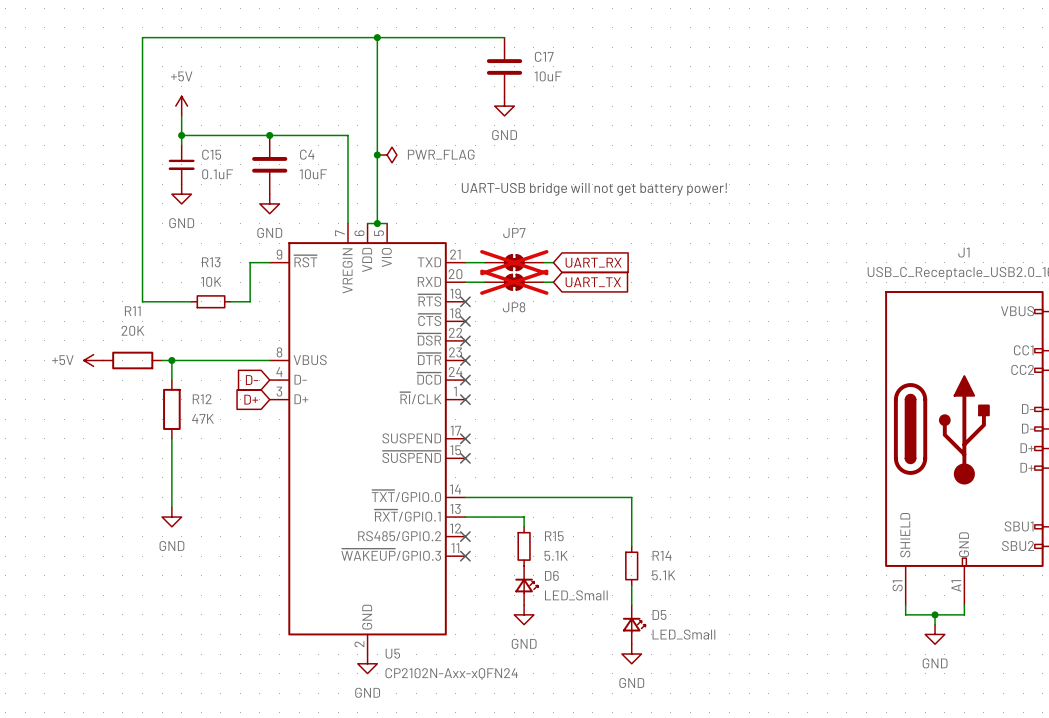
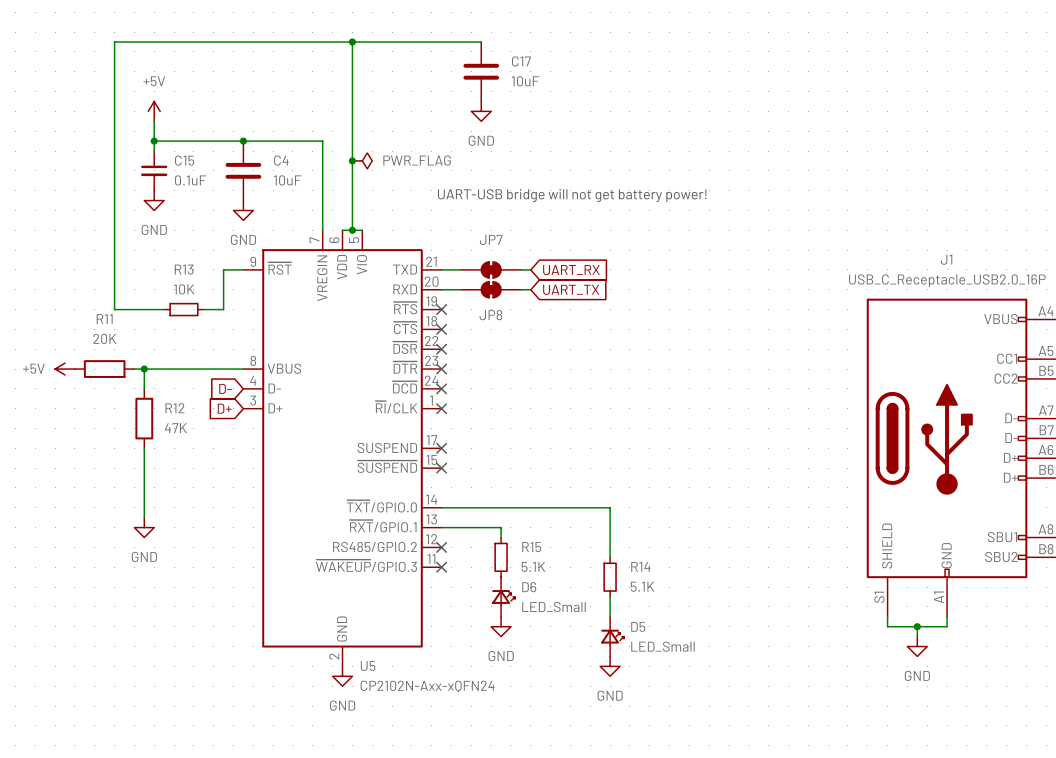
JP7 do-not-place cross: (514, 262) -> none
JP8 do-not-place cross: (514, 282) -> none

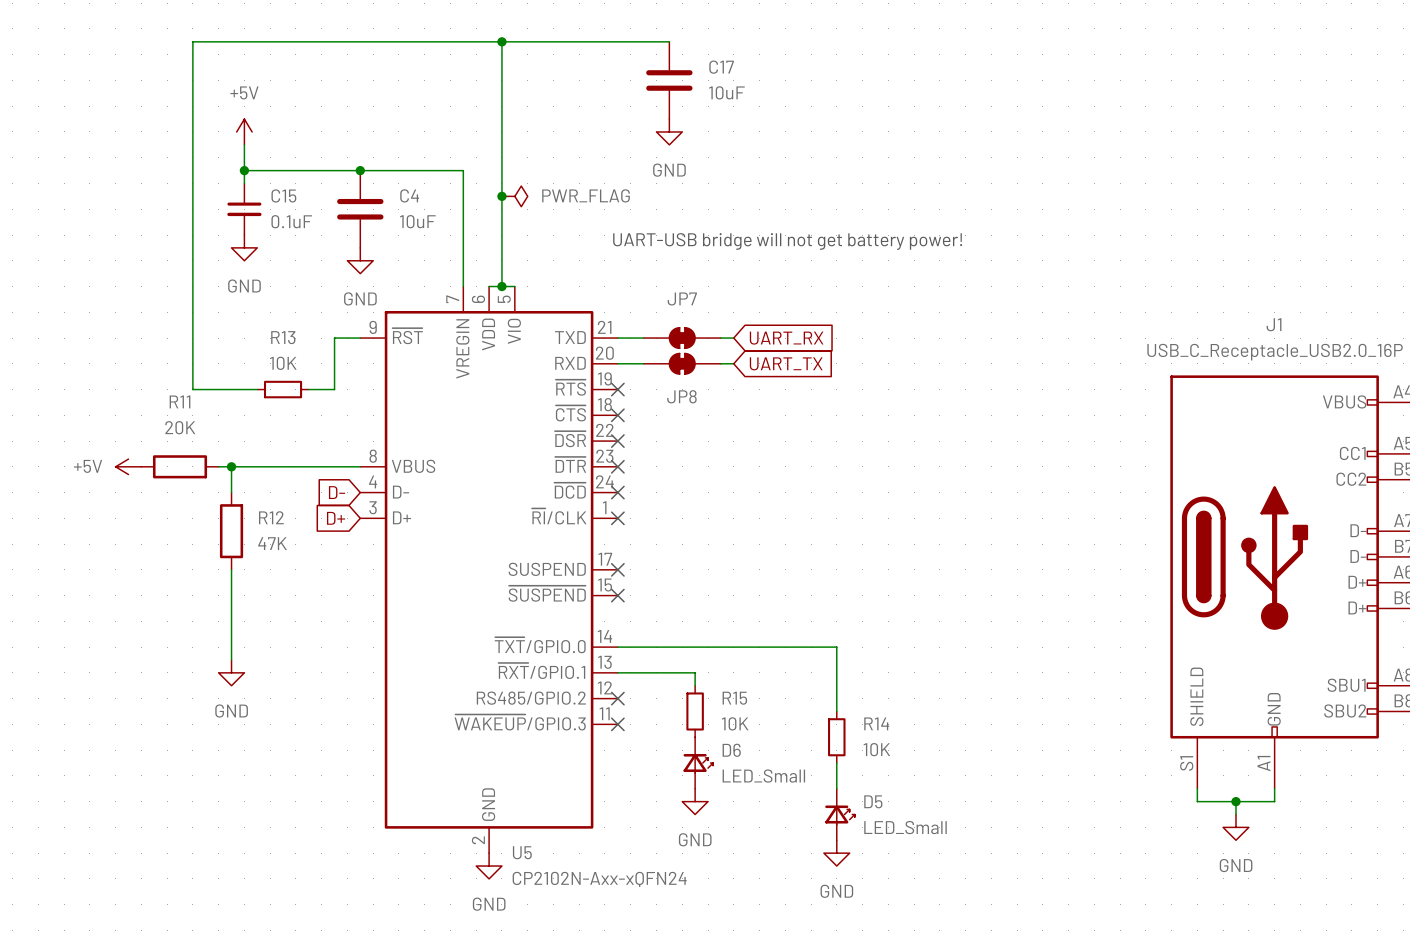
R15 value: 5.1K (533, 566) -> 10K (735, 723)
R14 value: 5.1K (642, 586) -> 10K (876, 749)

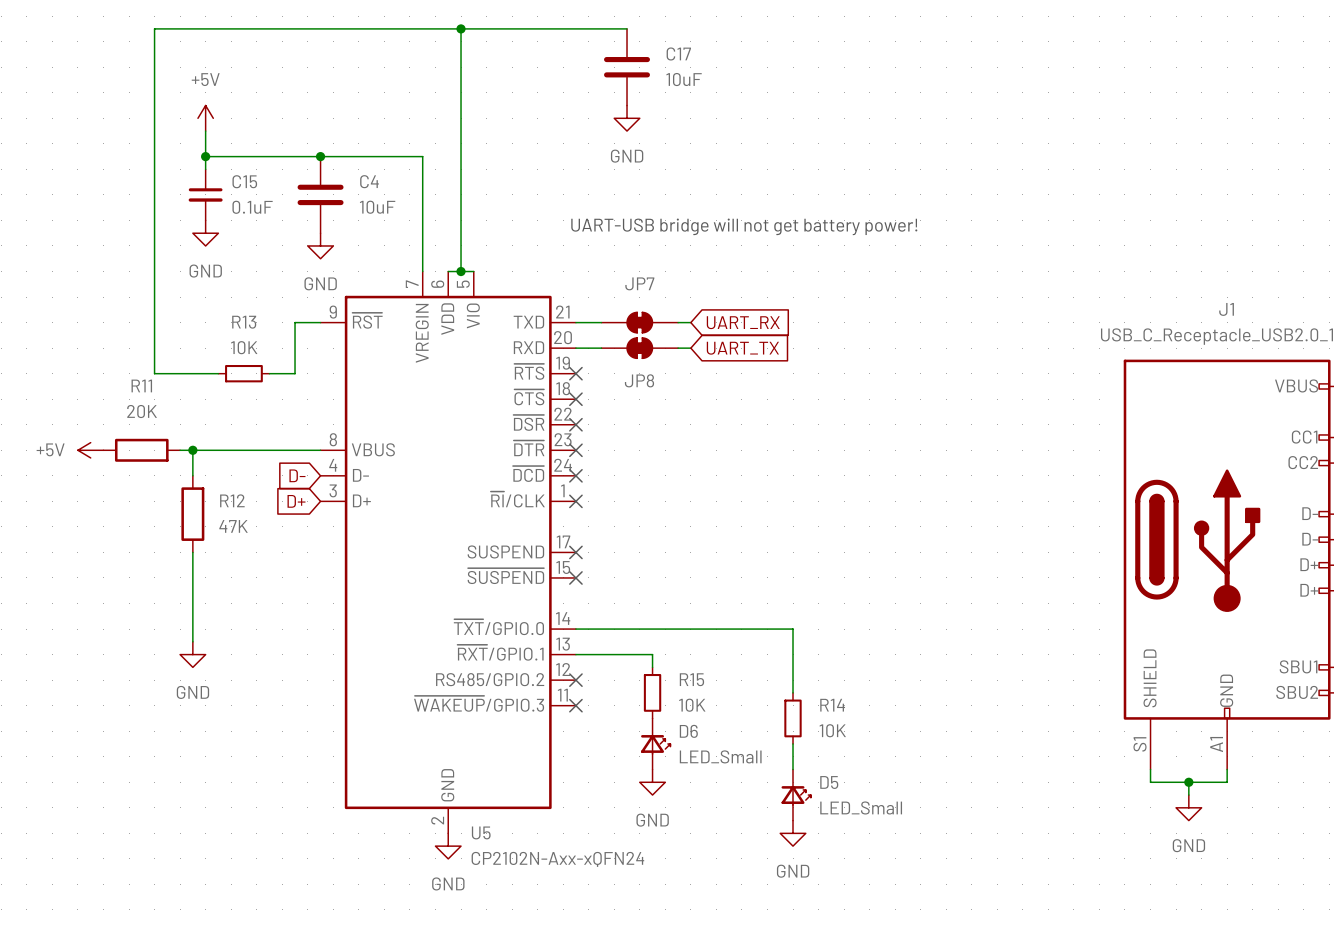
junction: (501, 196) -> none
power symbol: PWR_FLAG (514, 196) -> none

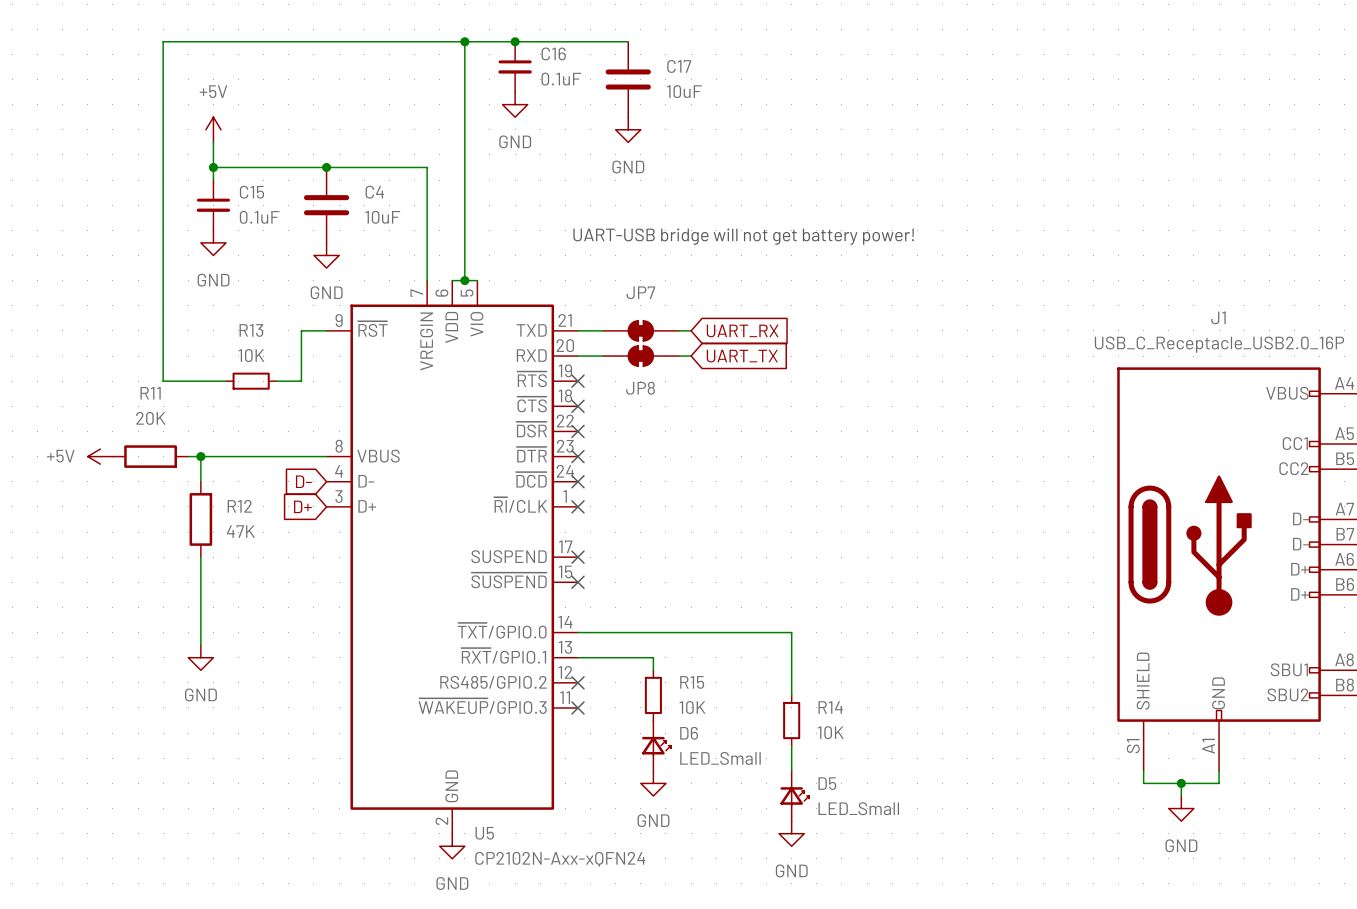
junction: none -> (515, 41)
C16: none -> 0.1uF (515, 66)
power symbol: none -> GND (515, 104)

